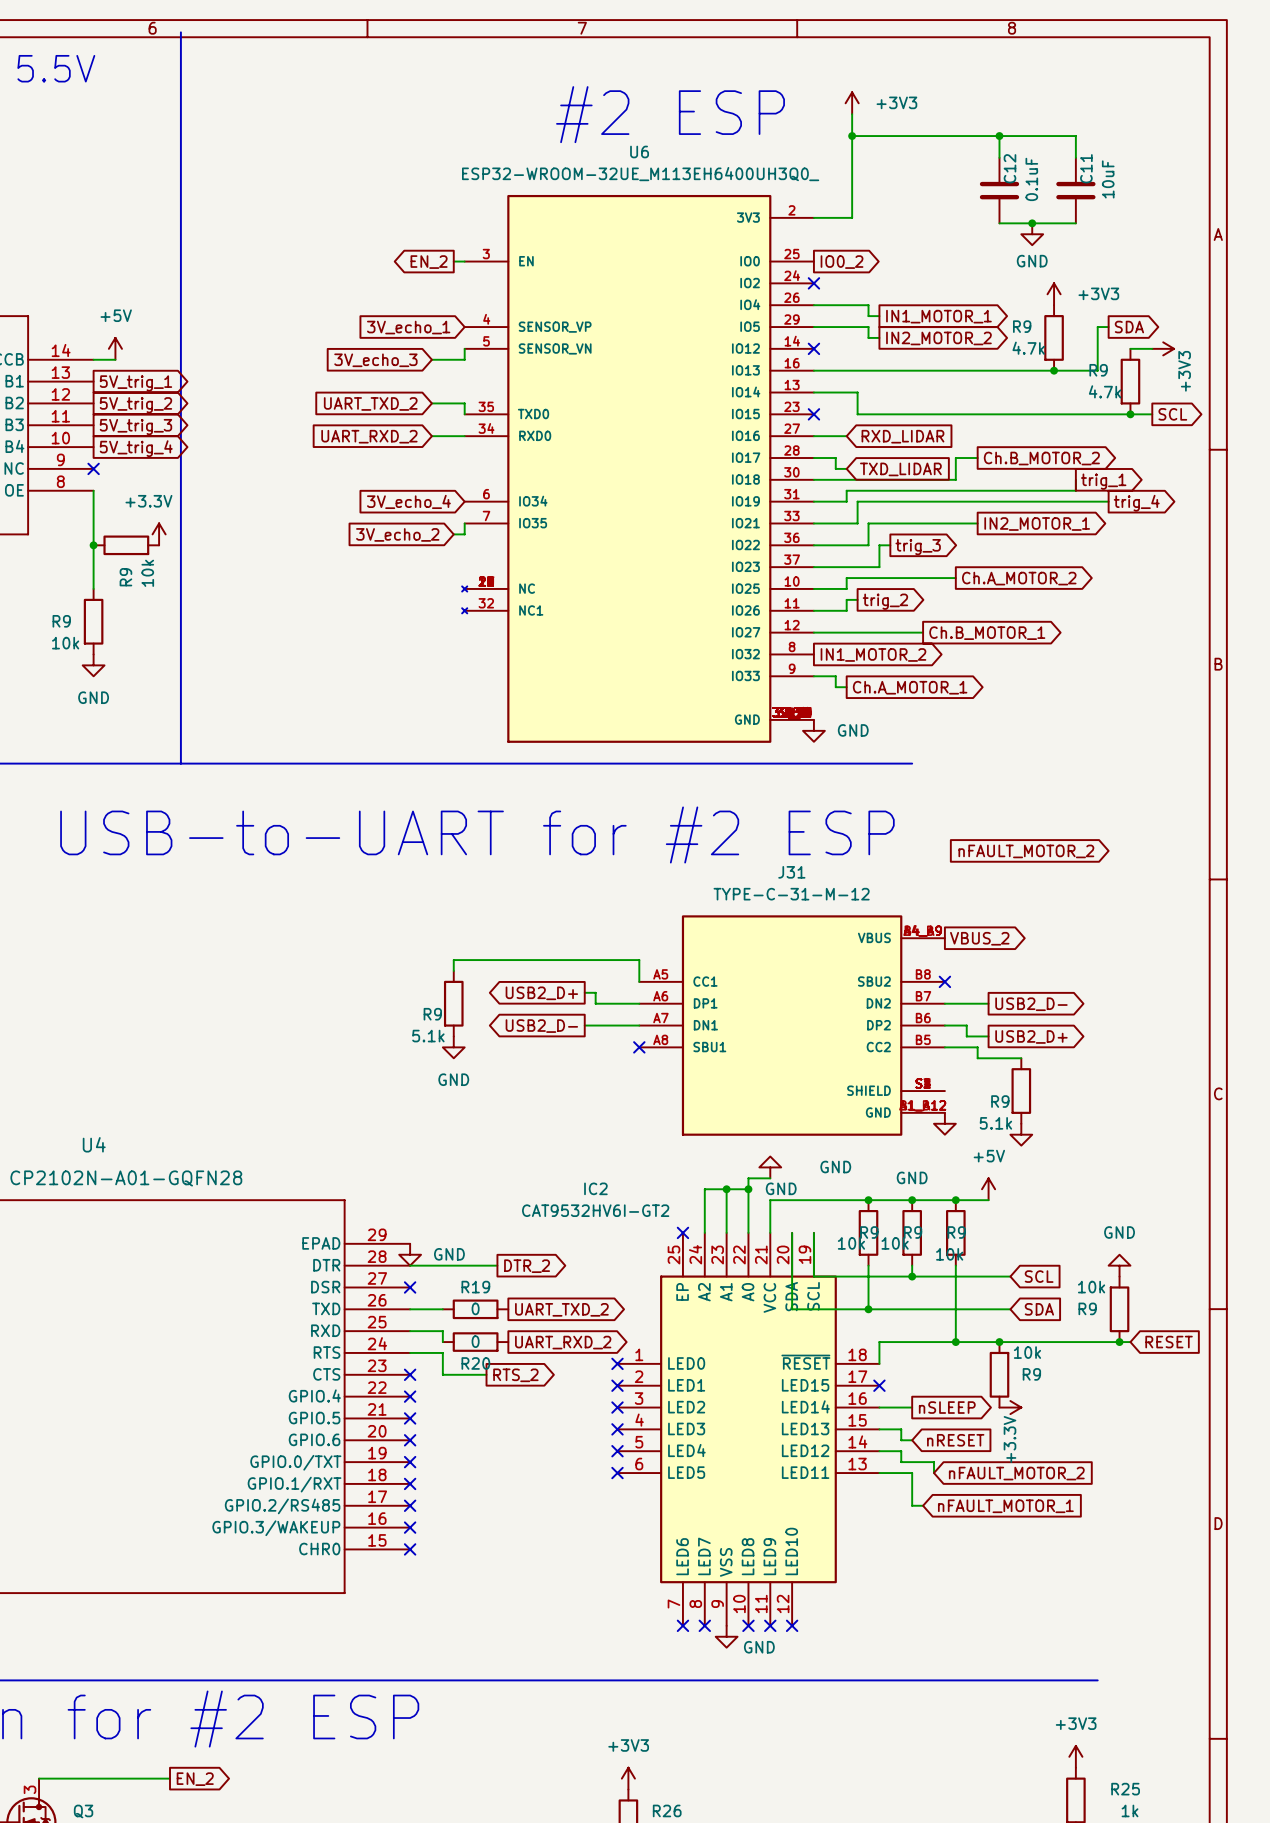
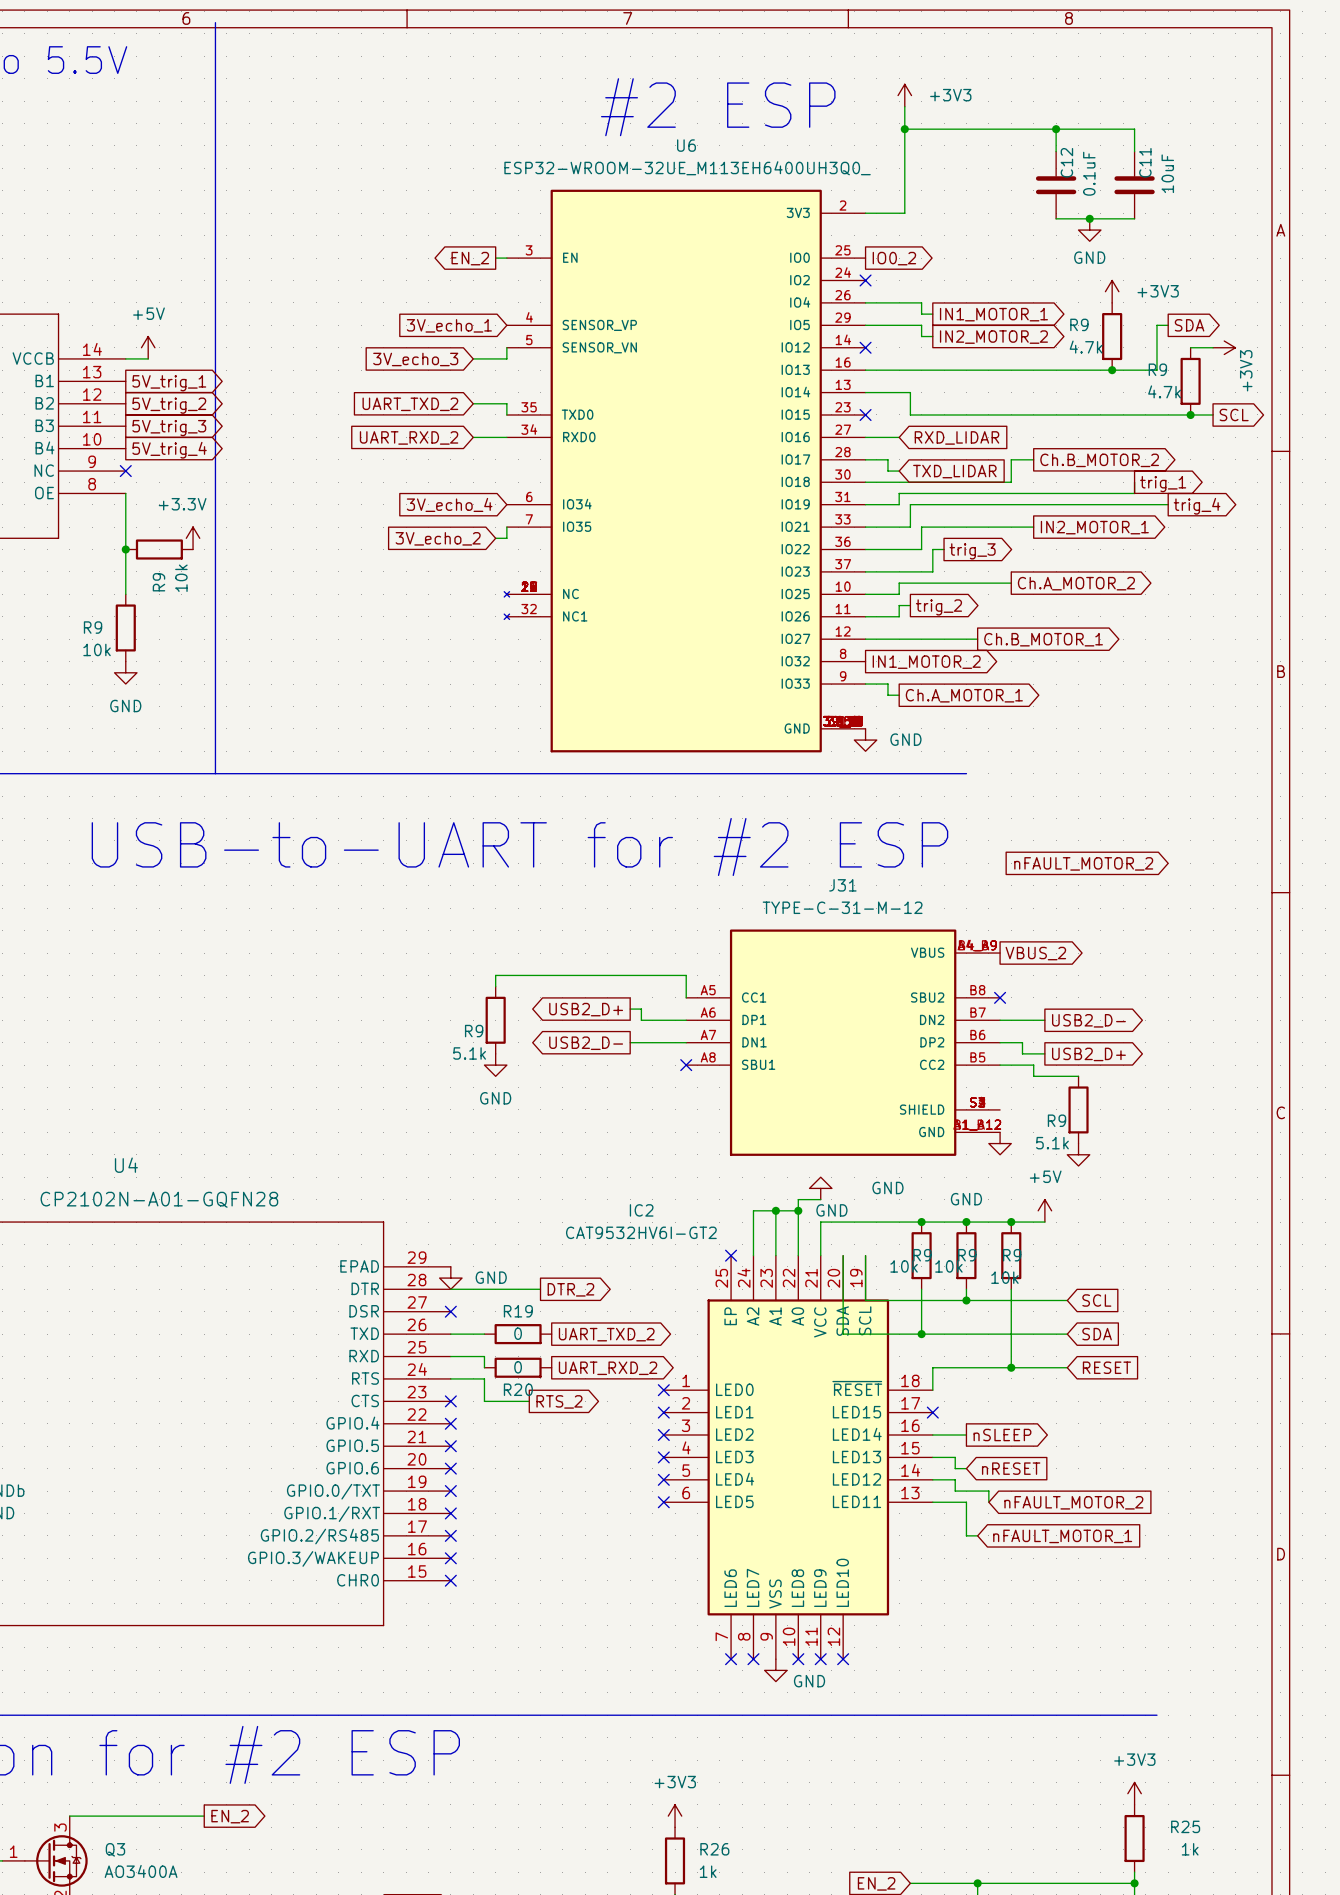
power symbol: GND (1119, 1265) -> none
R9: 10k (1119, 1309) -> none
junction: (999, 1342) -> none
wire: (1010, 1342) (1130, 1342) -> none
junction: (1119, 1342) -> none
global label position: RESET (1169, 1342) -> RESET (1106, 1367)
R9: 10k (999, 1374) -> none
power symbol: +3.3V (1010, 1407) -> none

